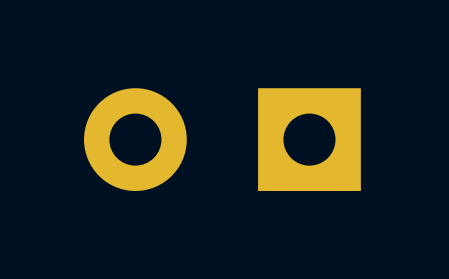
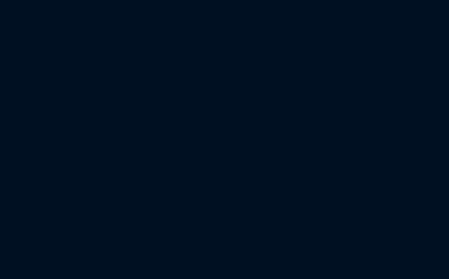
part: (222, 139) -> none

